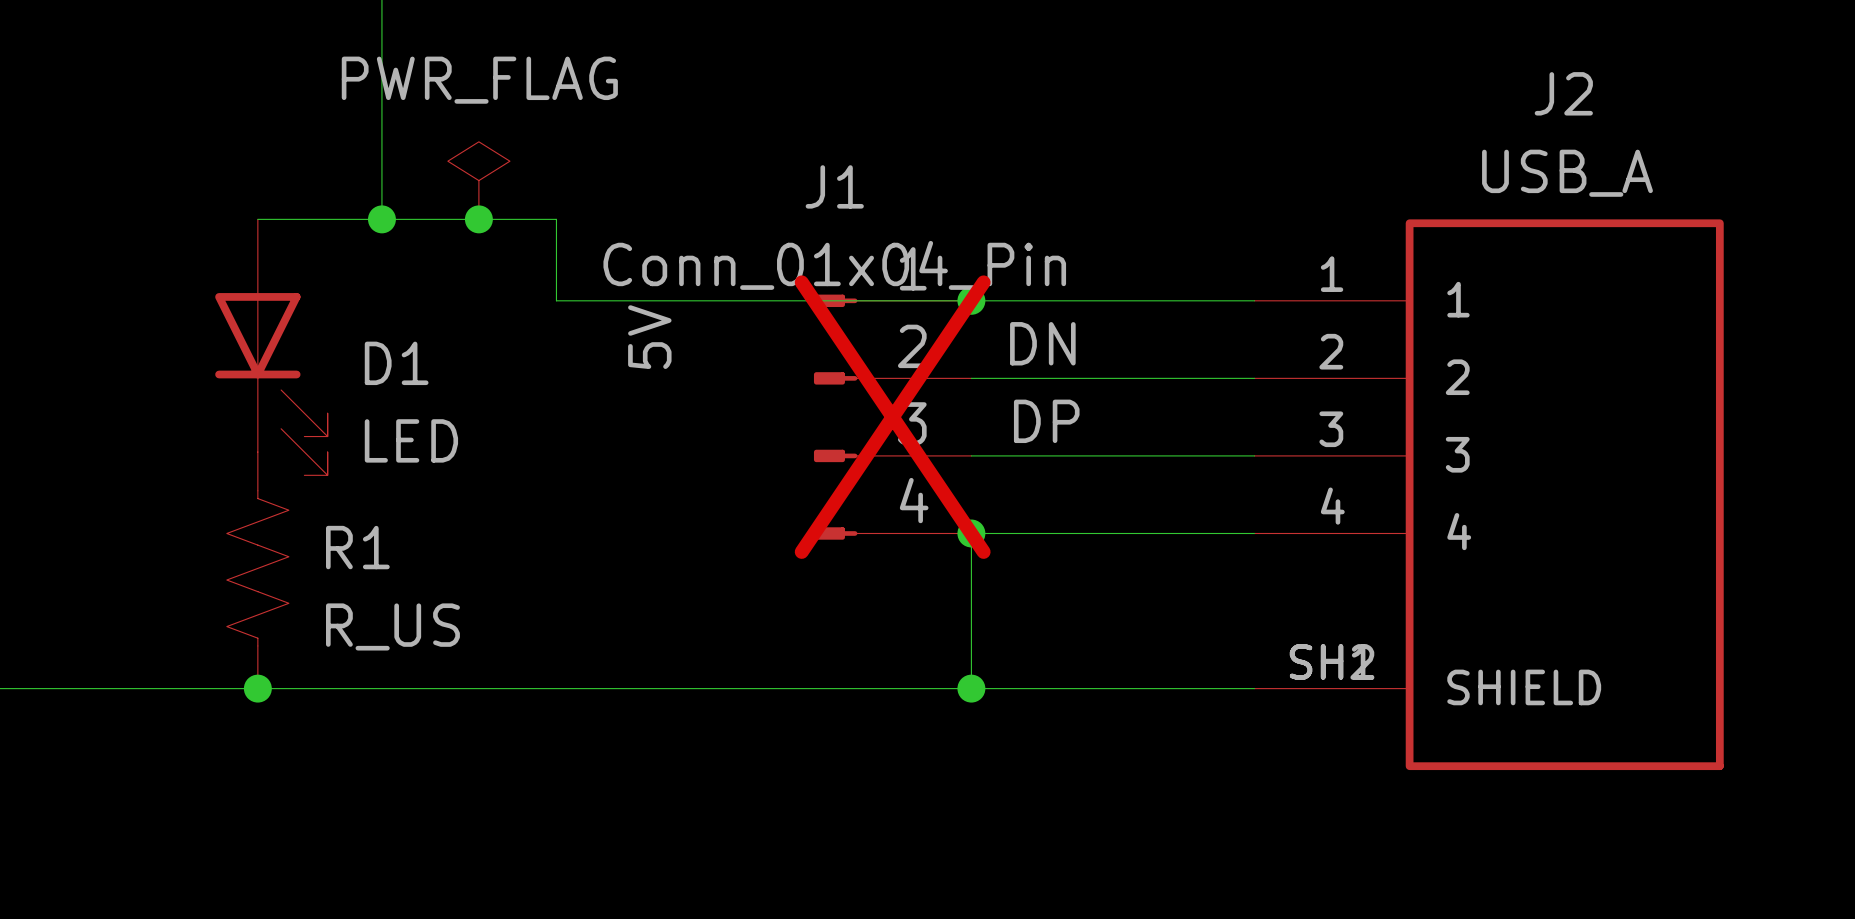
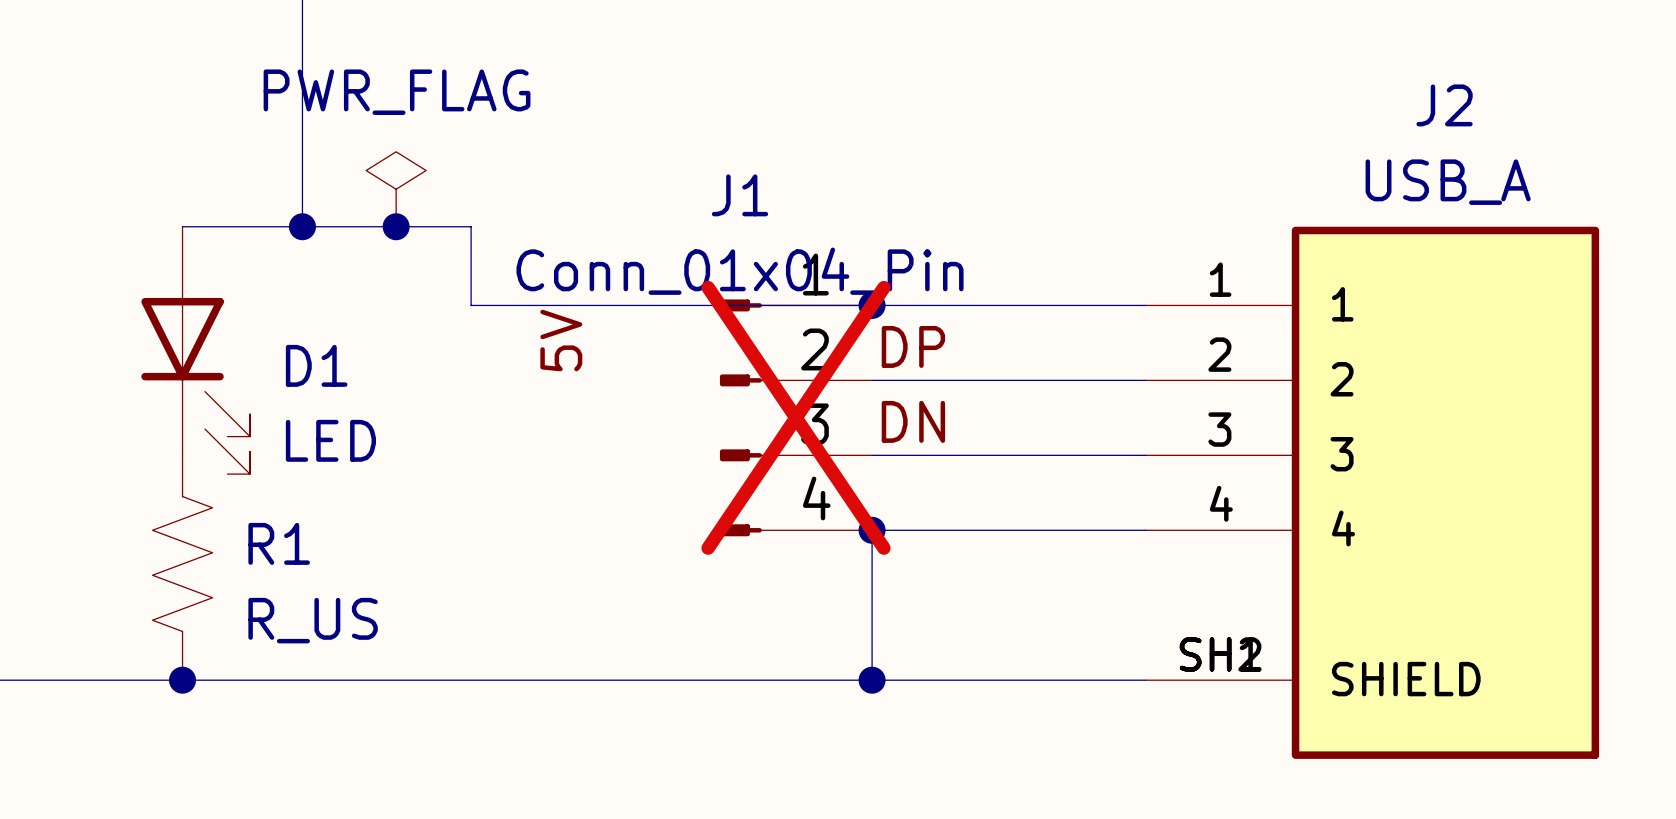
label: DN (1042, 343) -> DP (913, 346)
label: none -> DN (913, 421)
label: DP (1046, 421) -> none

